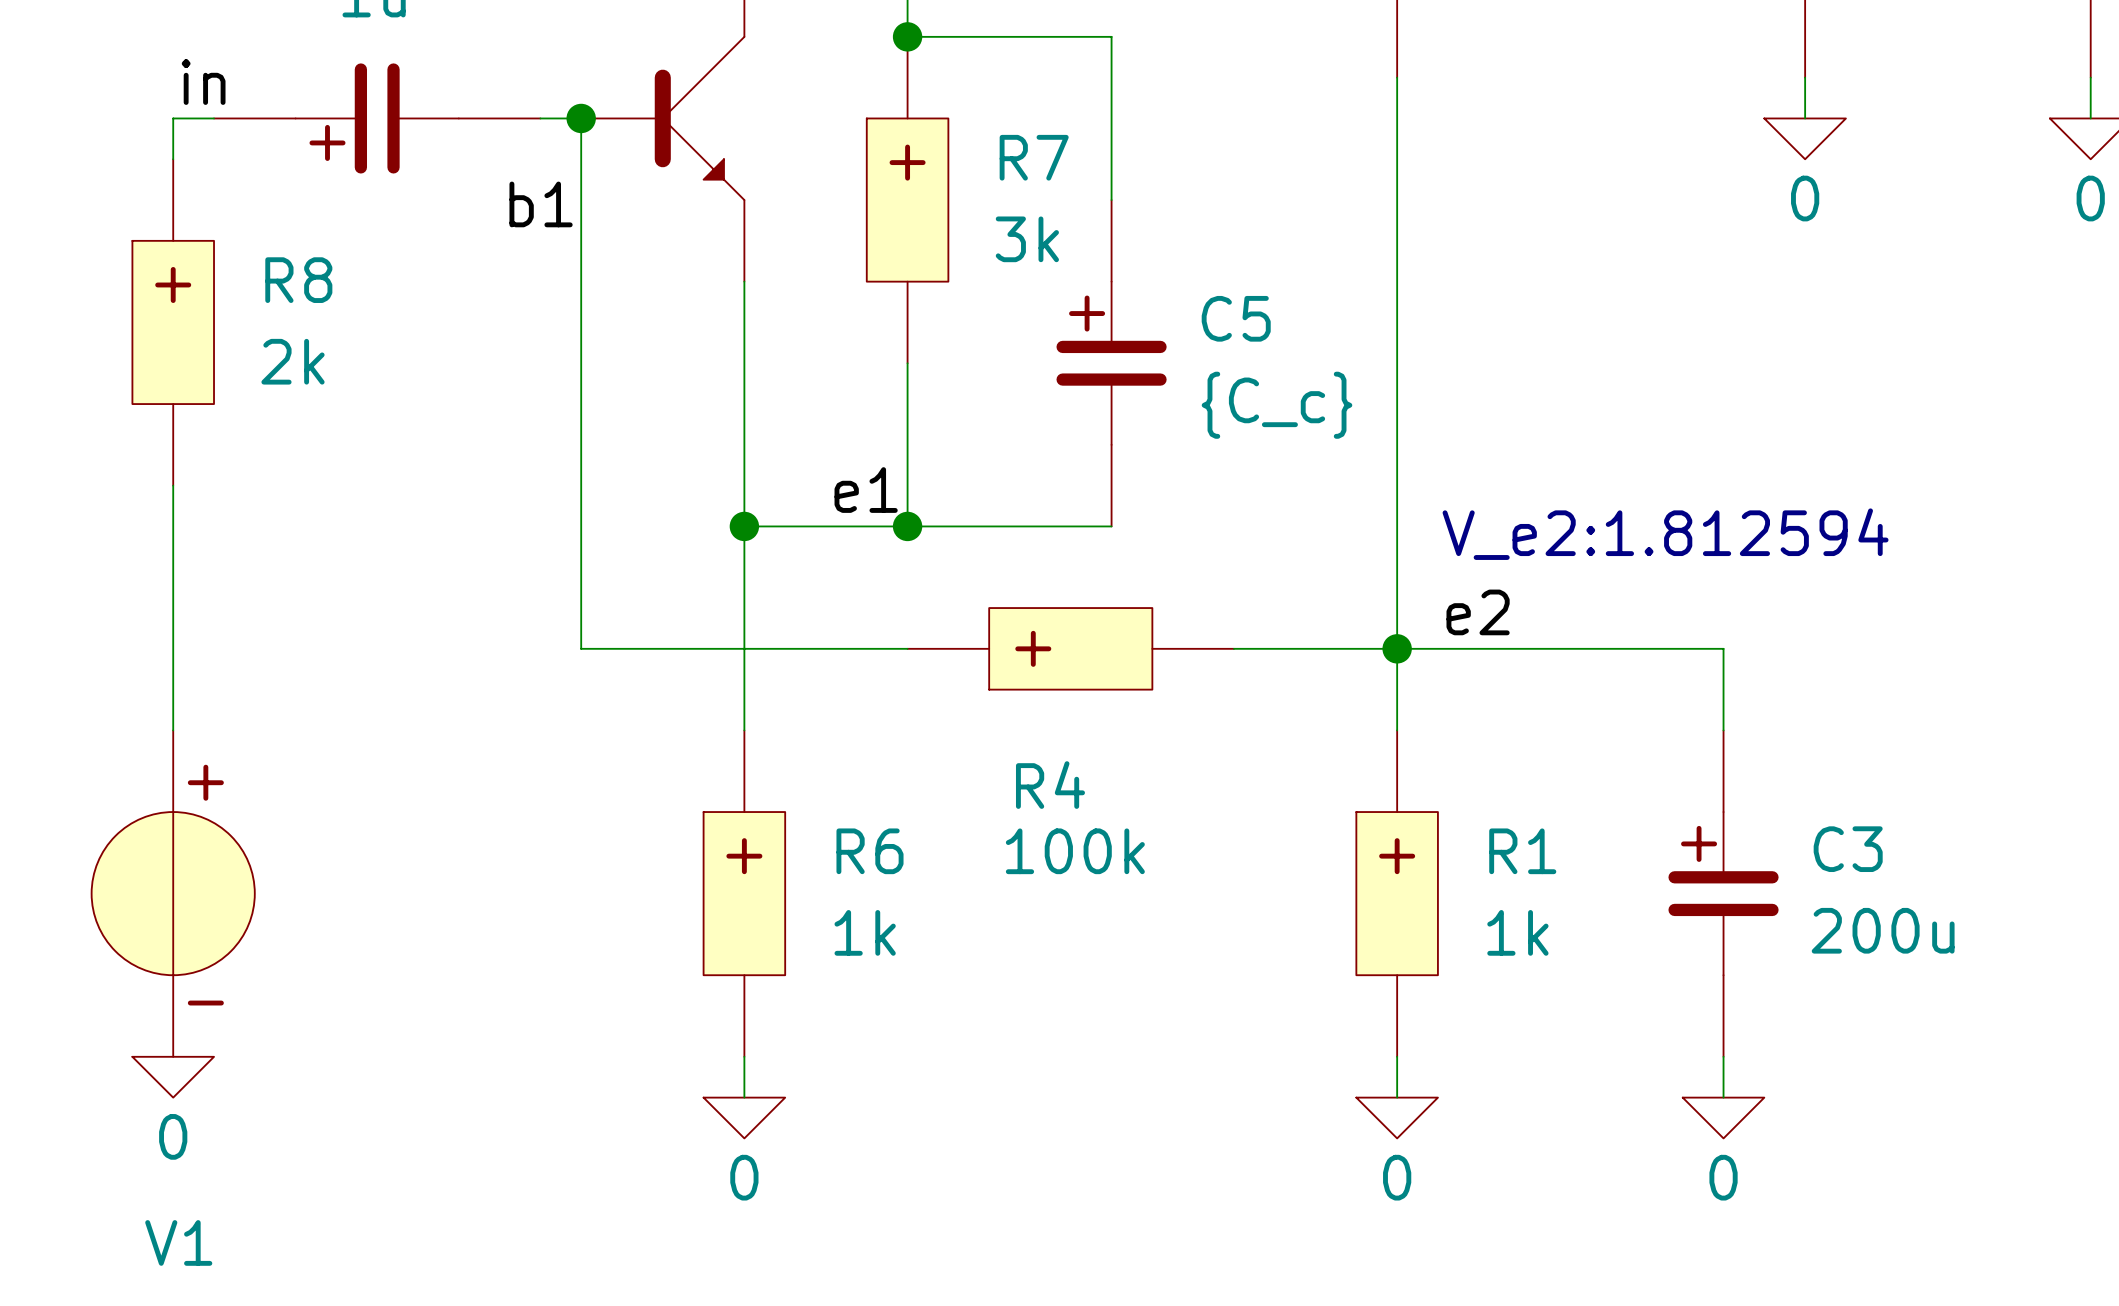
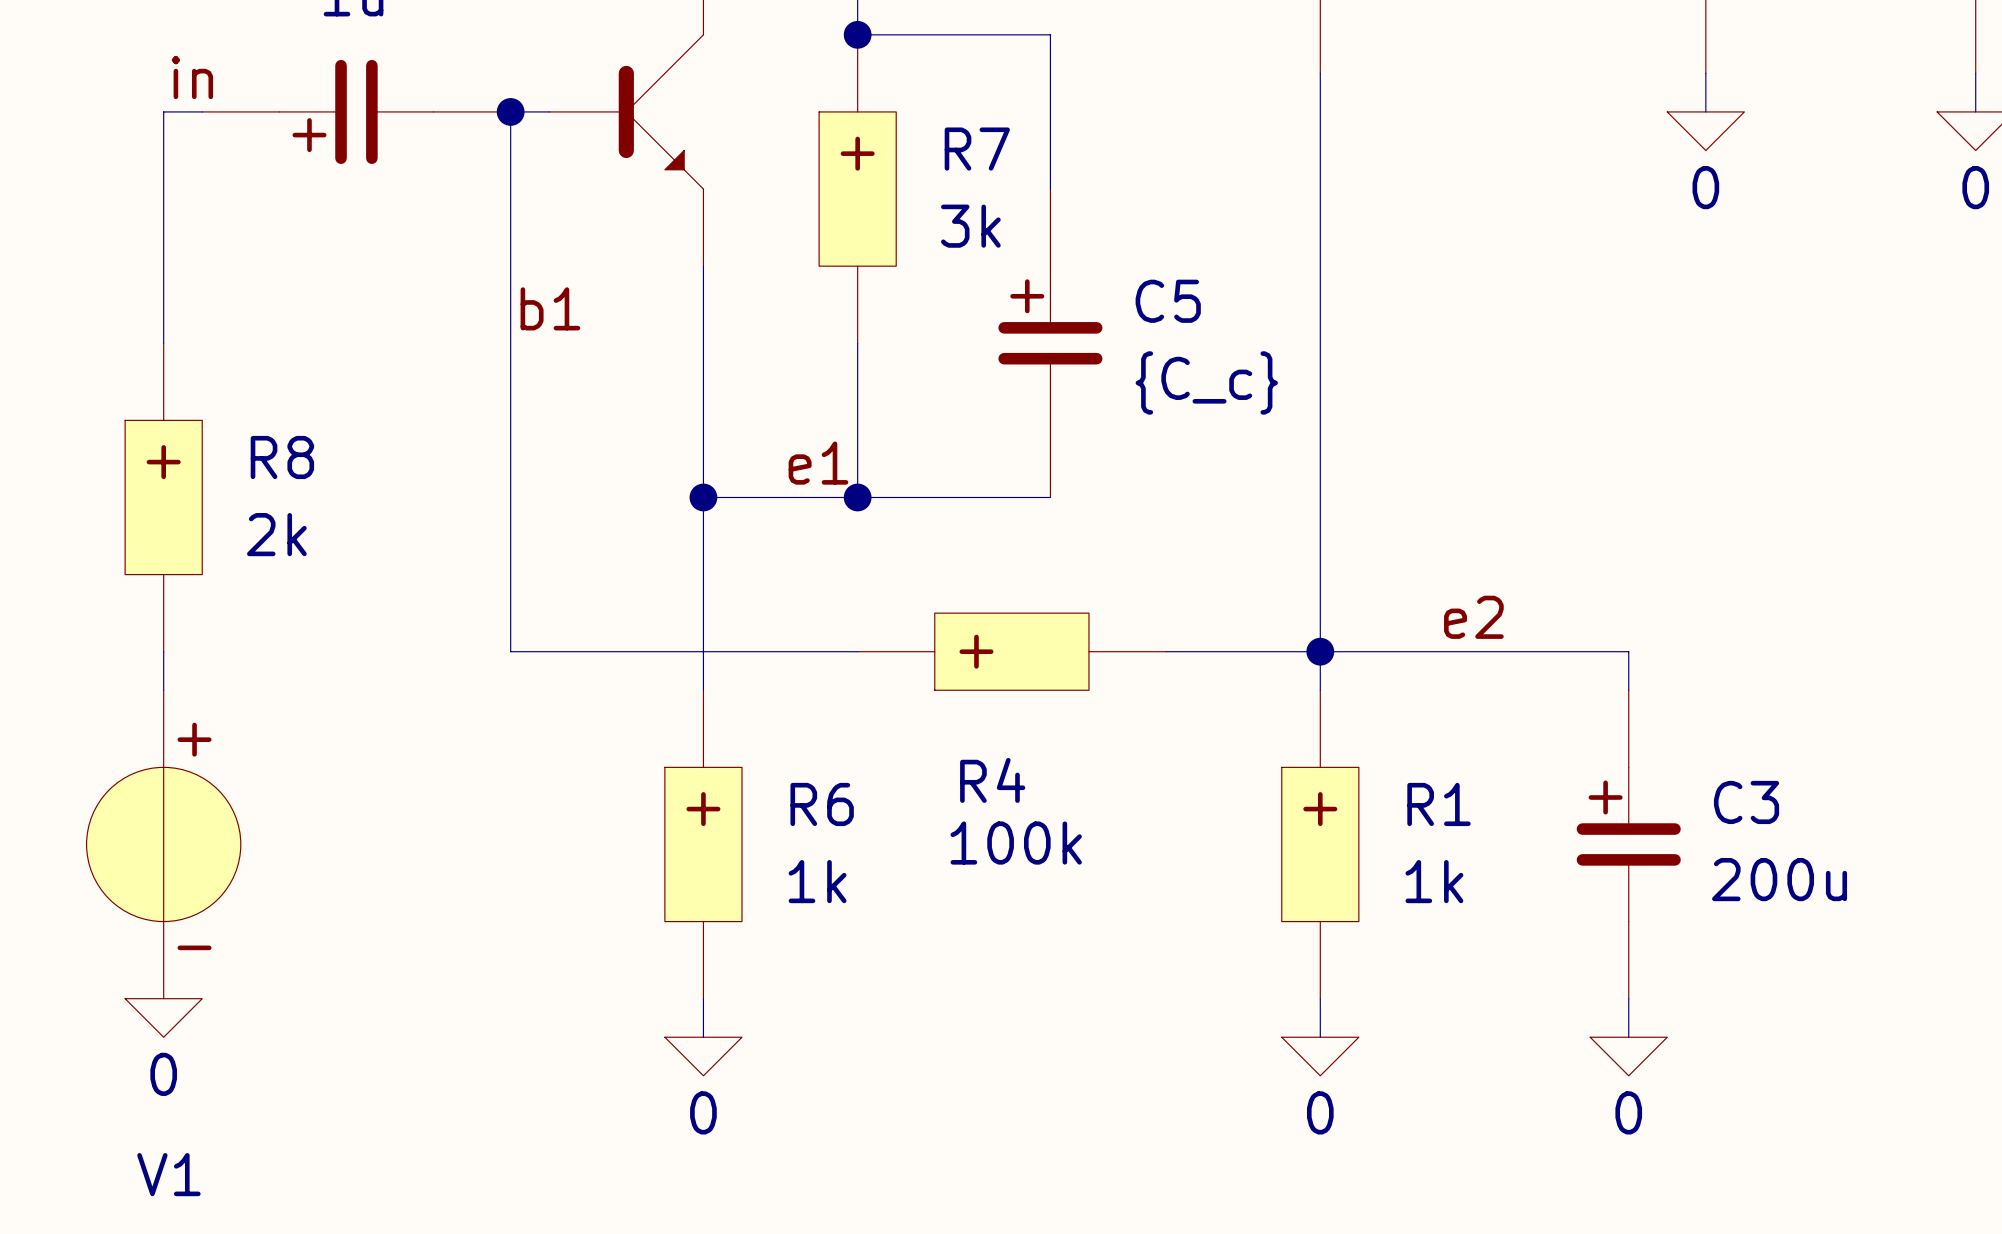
wire: none -> (510, 111) (510, 651) (857, 651)
wire: (581, 118) (581, 648) (907, 648) -> none
junction position: (581, 118) -> (510, 111)
label position: b1 (541, 204) -> b1 (550, 308)
R8 position: (173, 322) -> (163, 497)
text: V_e2:1.812594 (1665, 534) -> none
label position: e2 (1478, 612) -> e2 (1473, 617)
R4 position: (1070, 648) -> (1011, 651)
wire: (1233, 648) (1723, 648) (1723, 689) -> (1166, 651) (1628, 651)
junction position: (1397, 648) -> (1320, 651)

